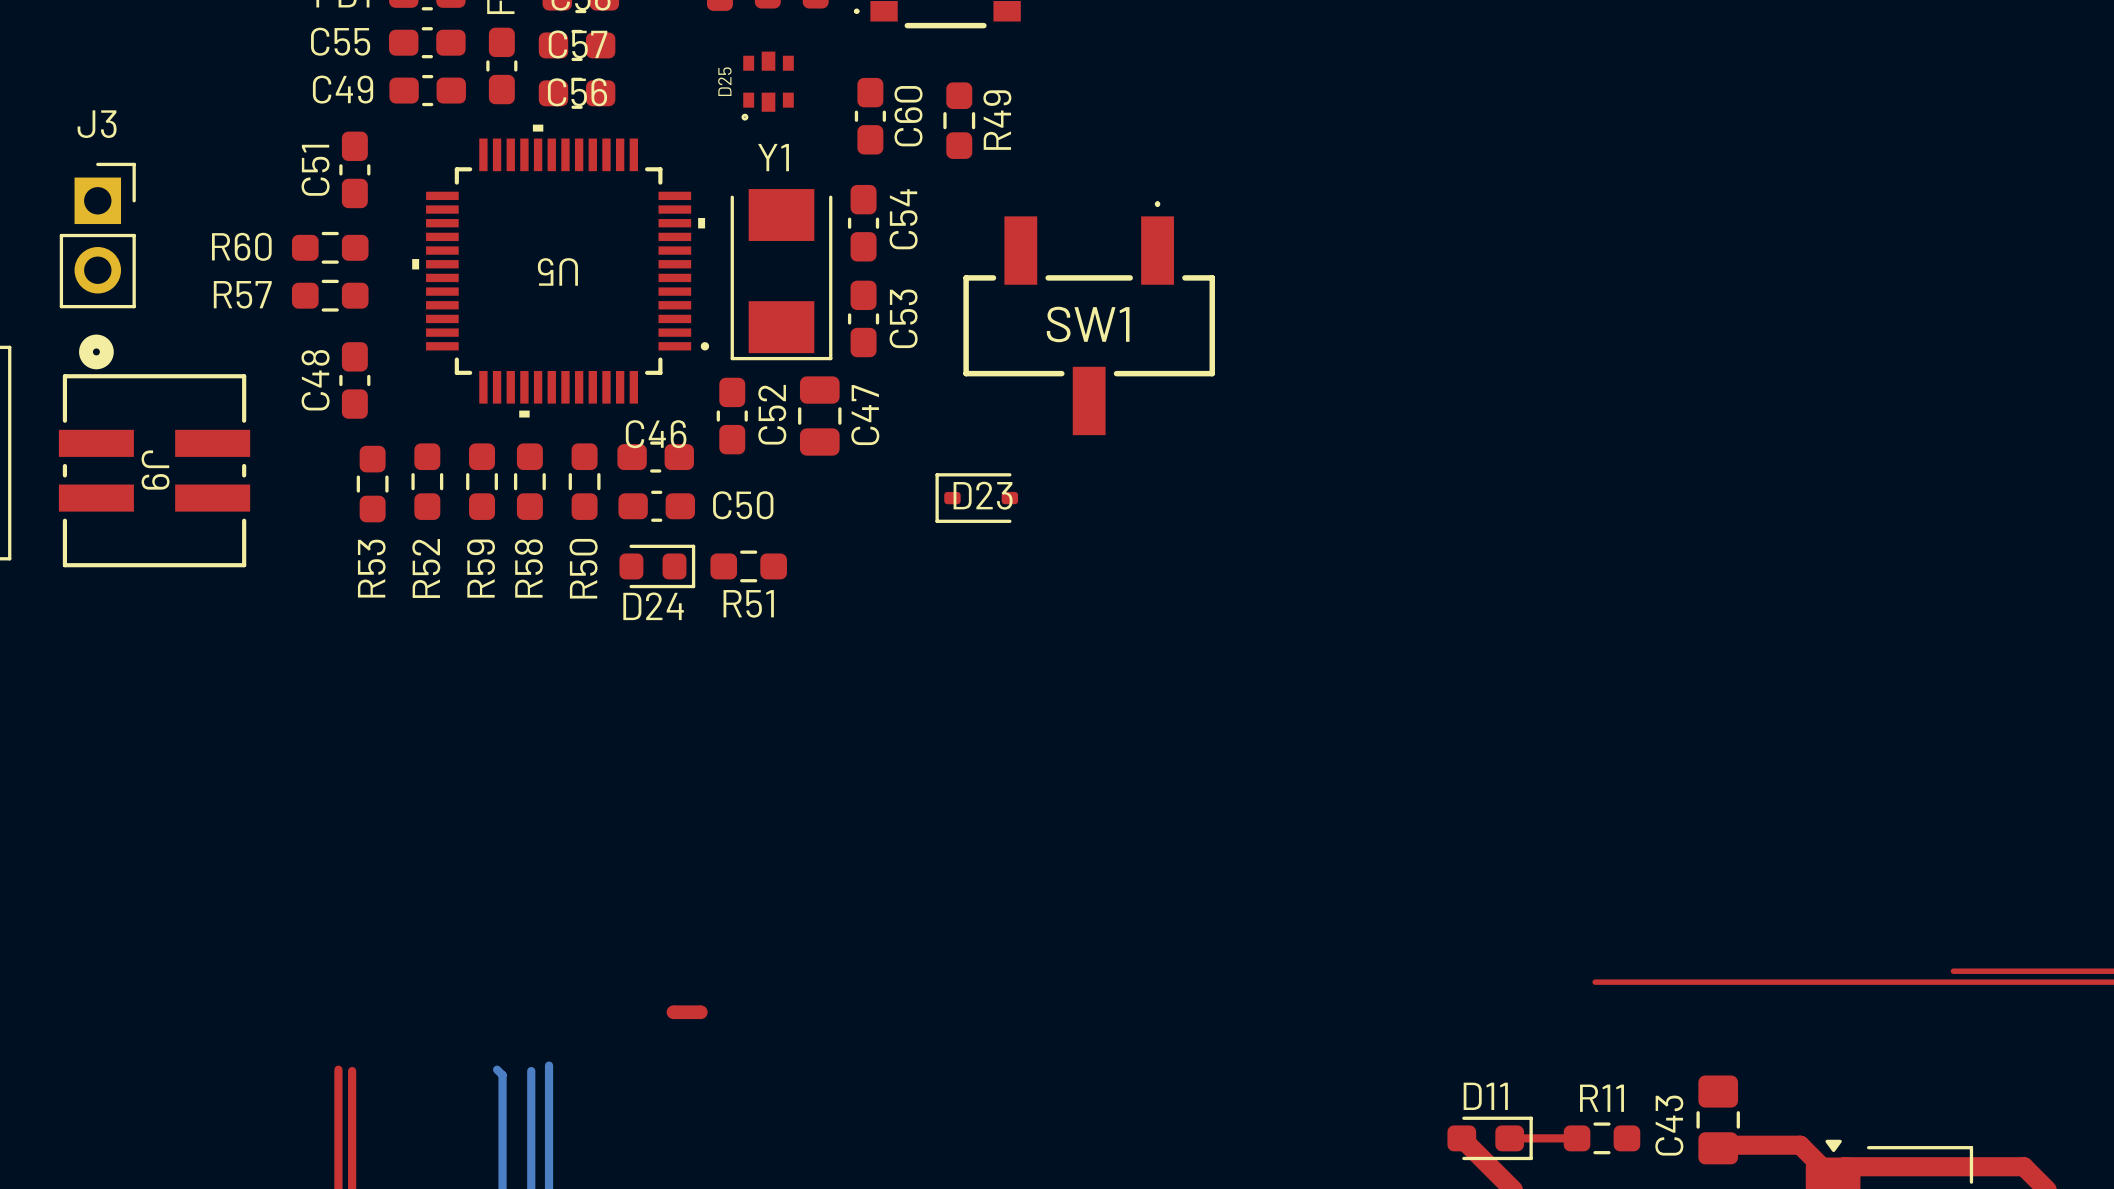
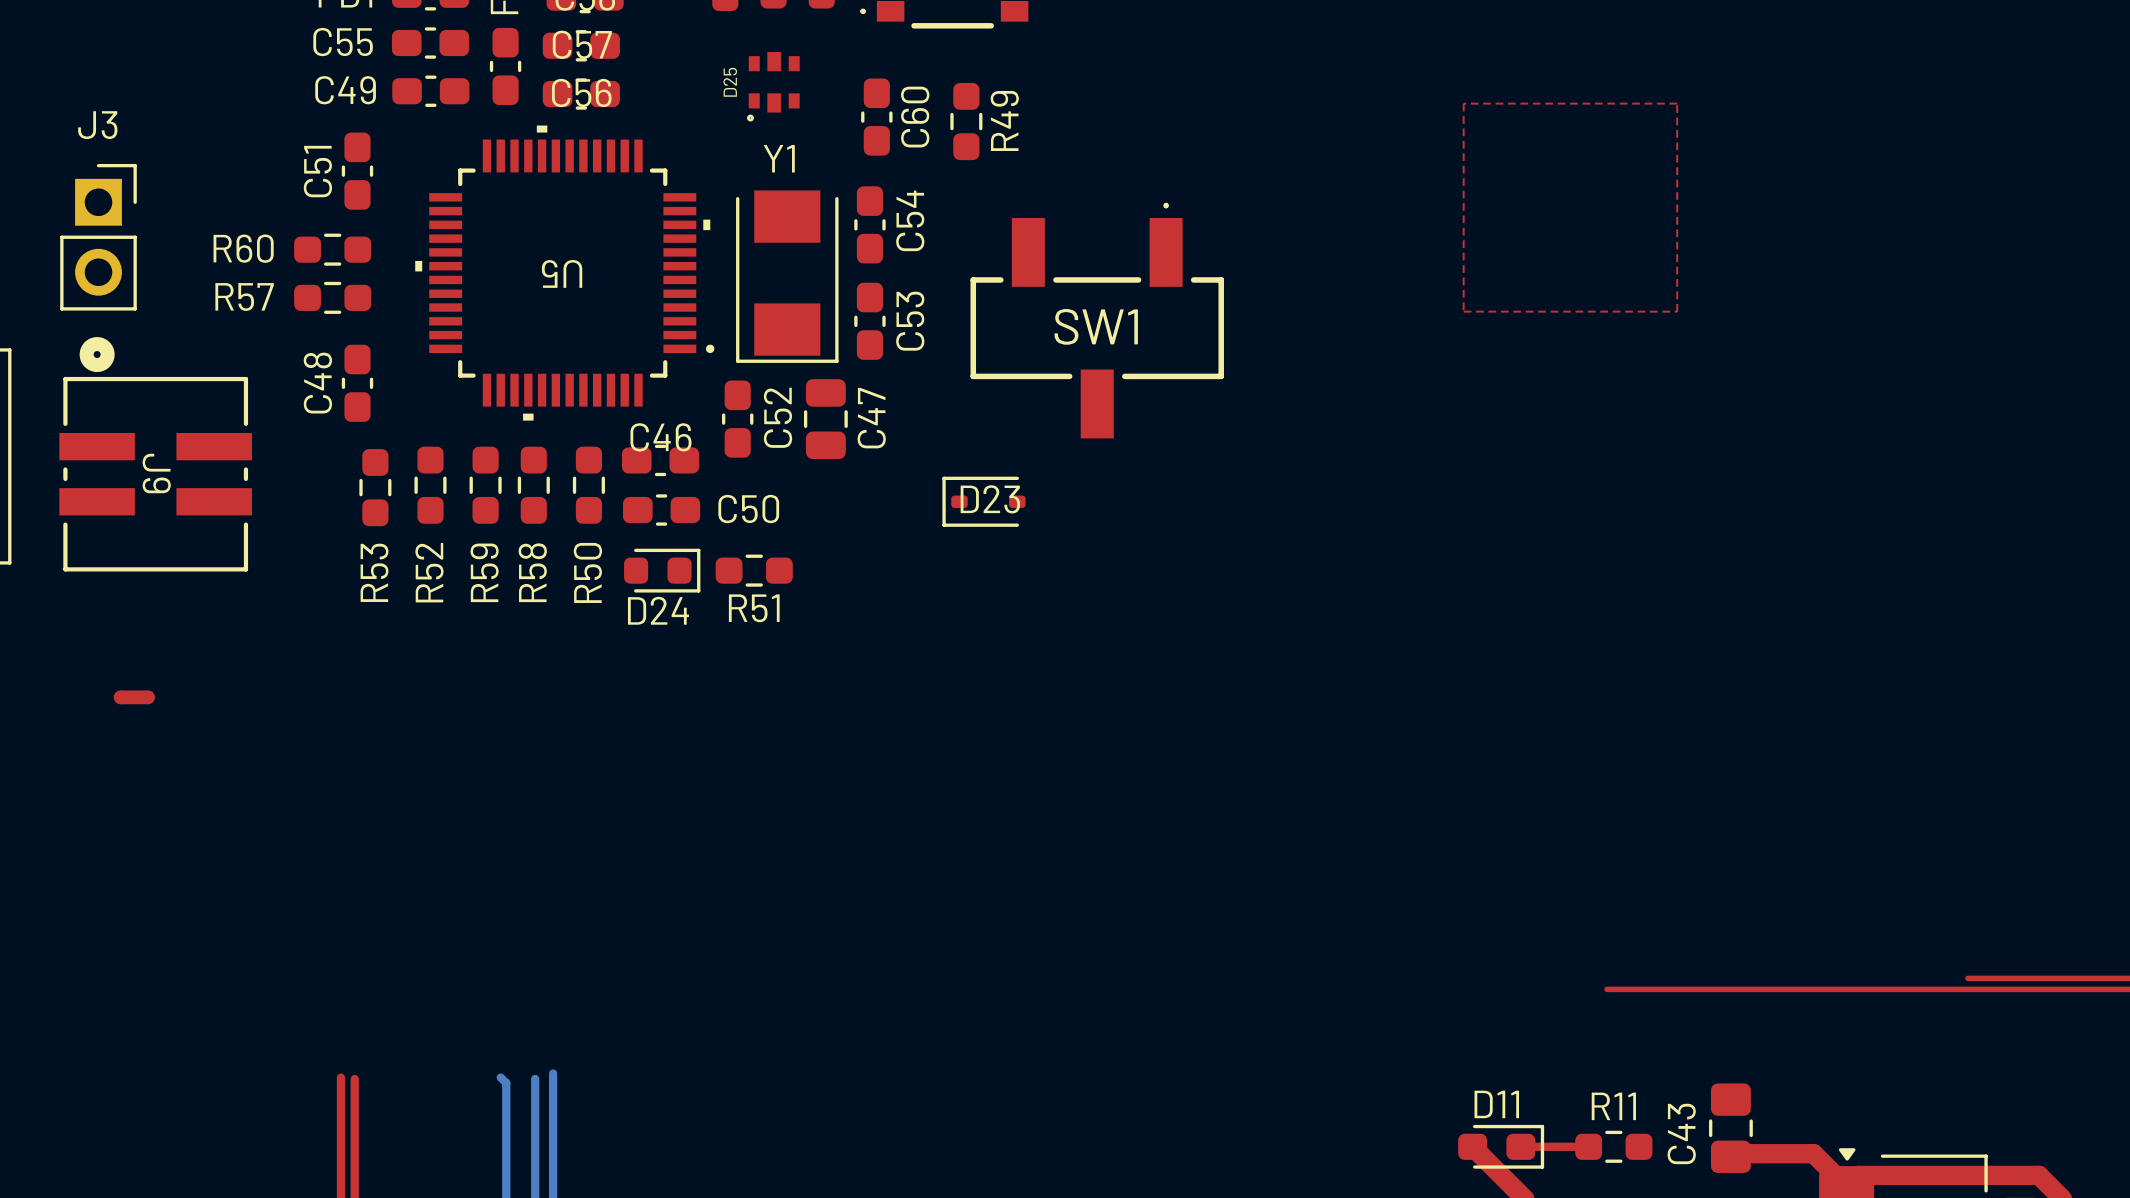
top zone outline: none -> (1463, 103) (1463, 311) (1677, 311) (1677, 103) (1463, 103)
part position: (687, 1012) -> (134, 697)

